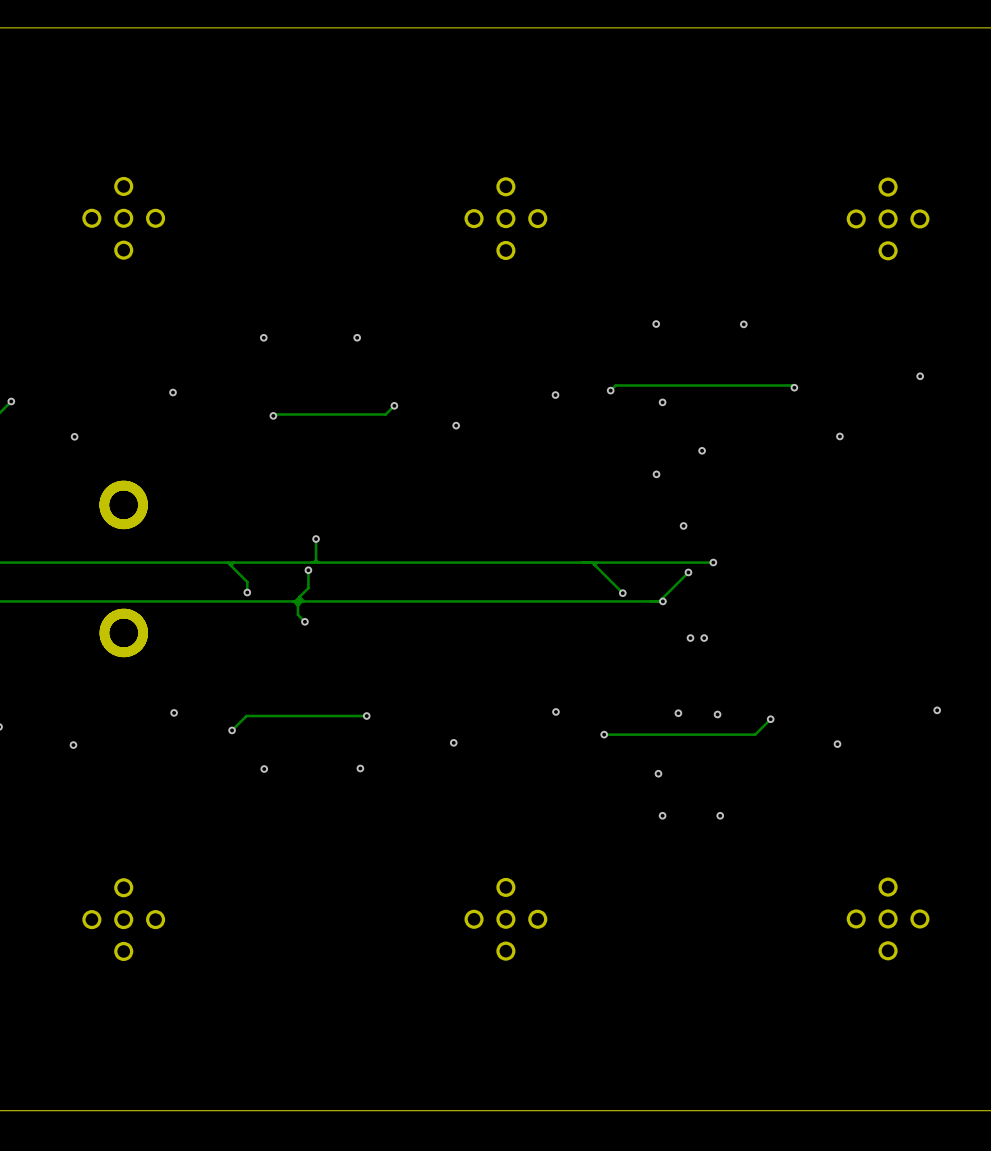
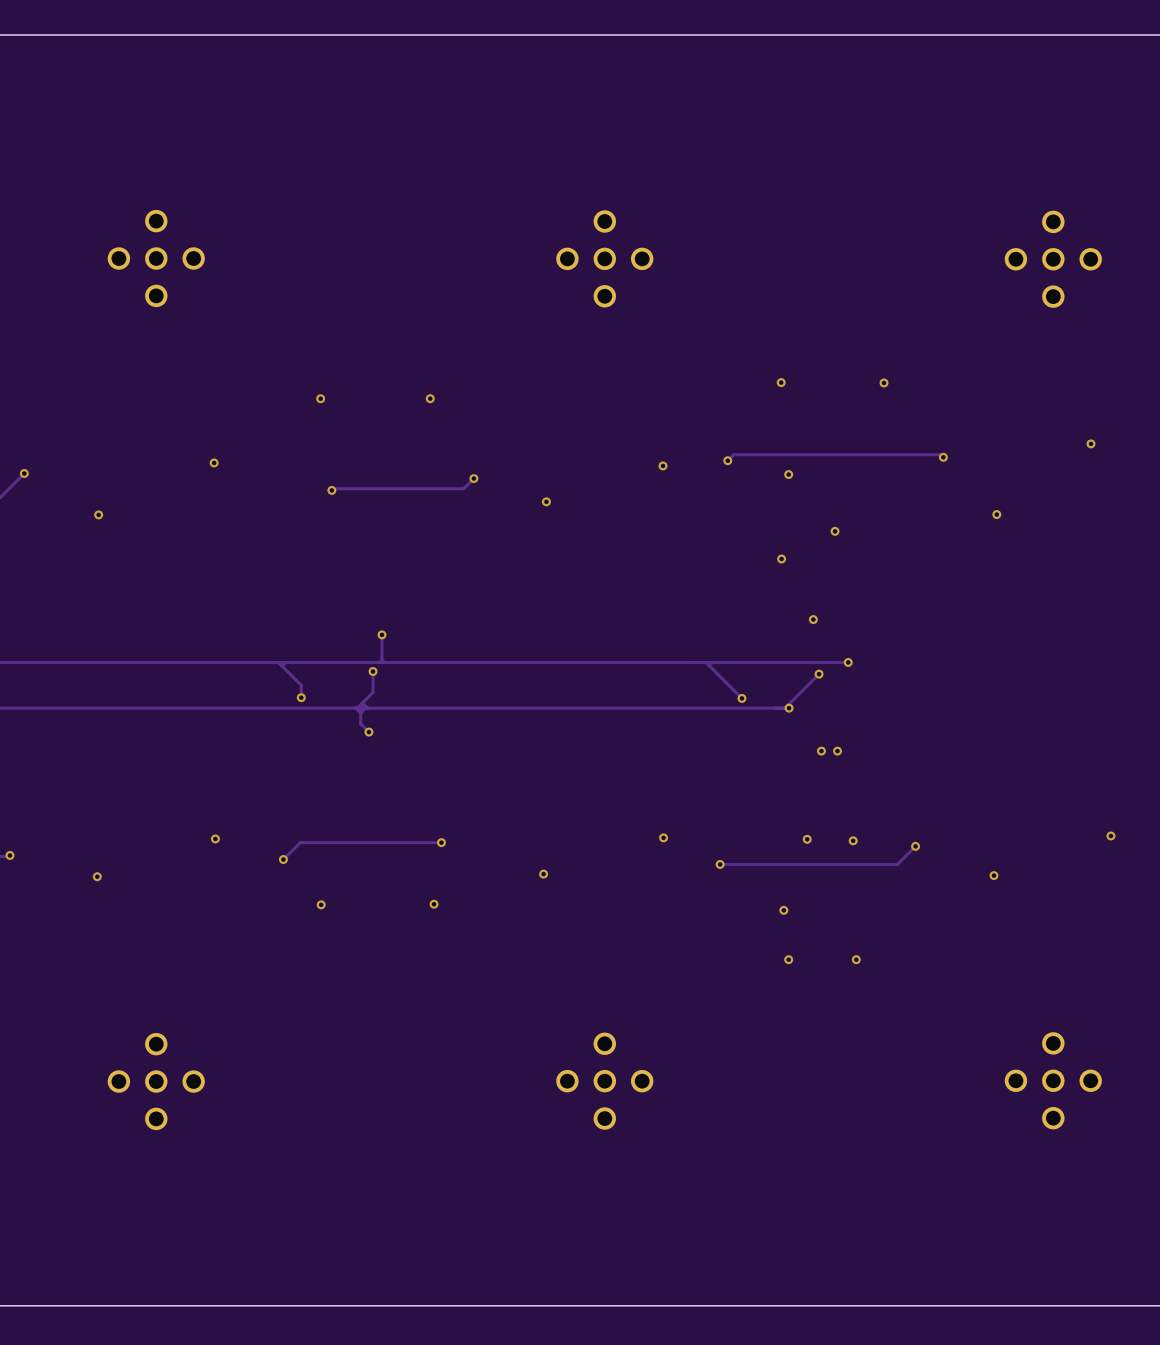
part: (123, 504) -> none
part: (123, 632) -> none

